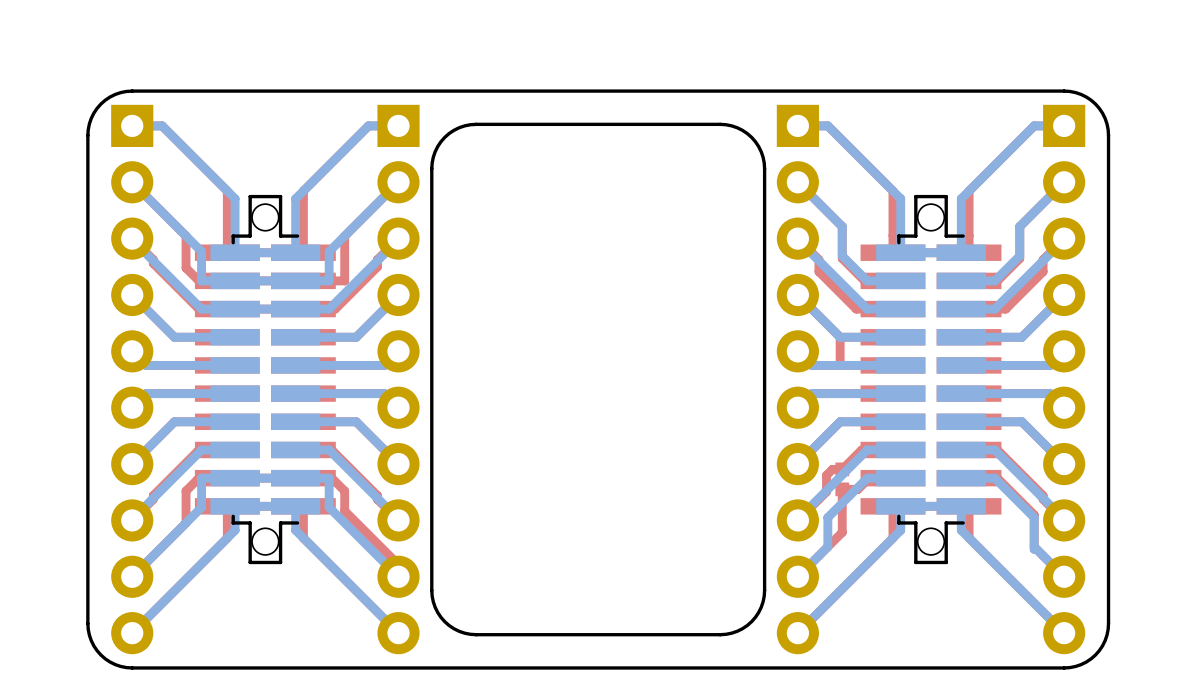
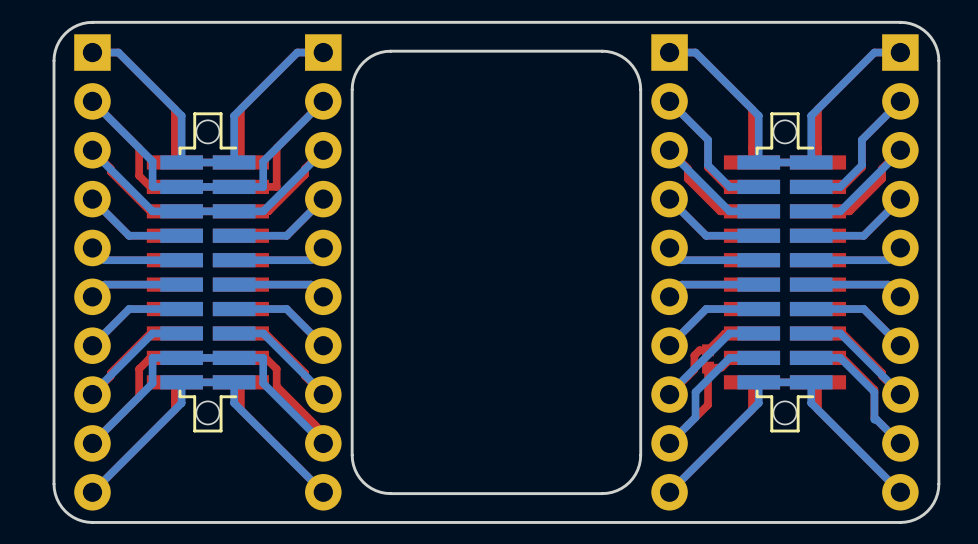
top track: (840, 337) (840, 363) (842, 365) -> none

